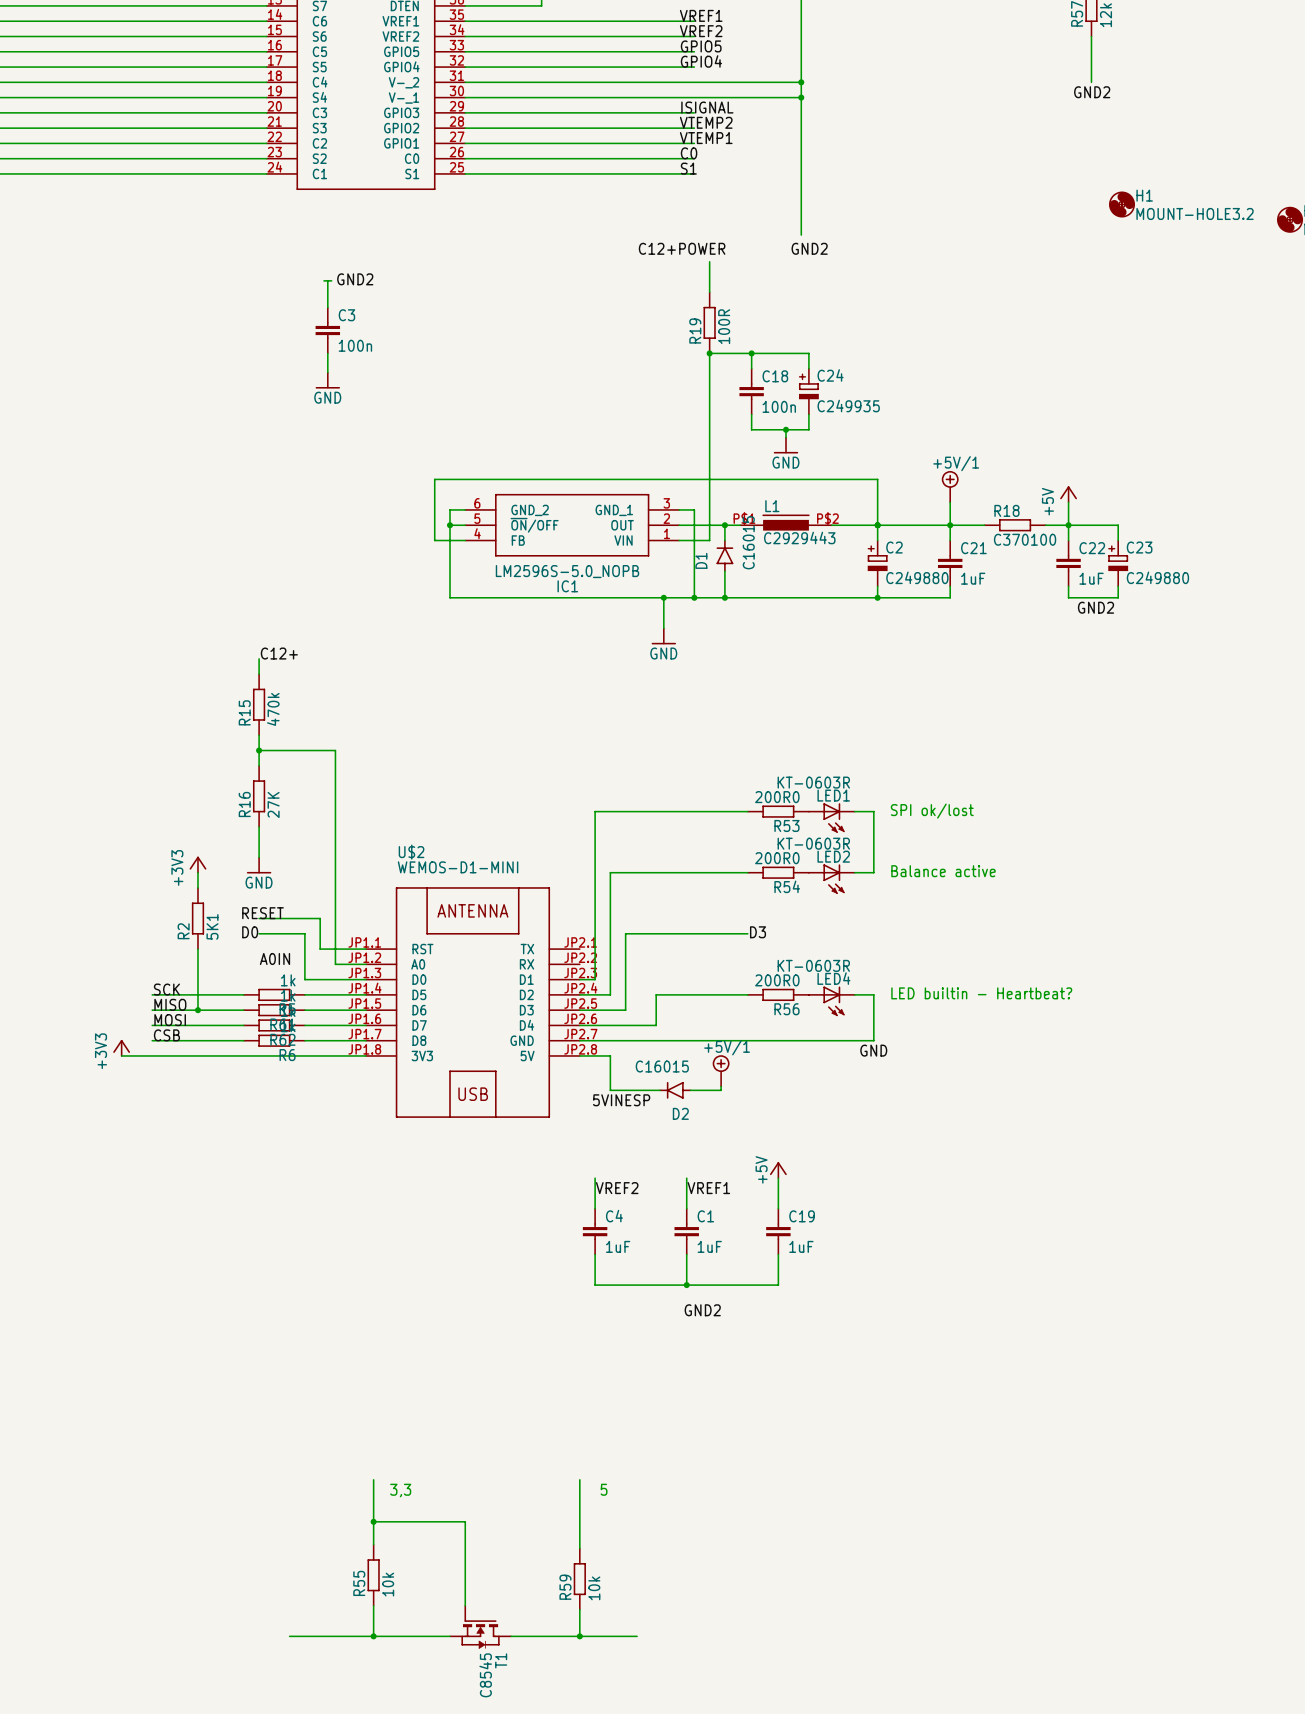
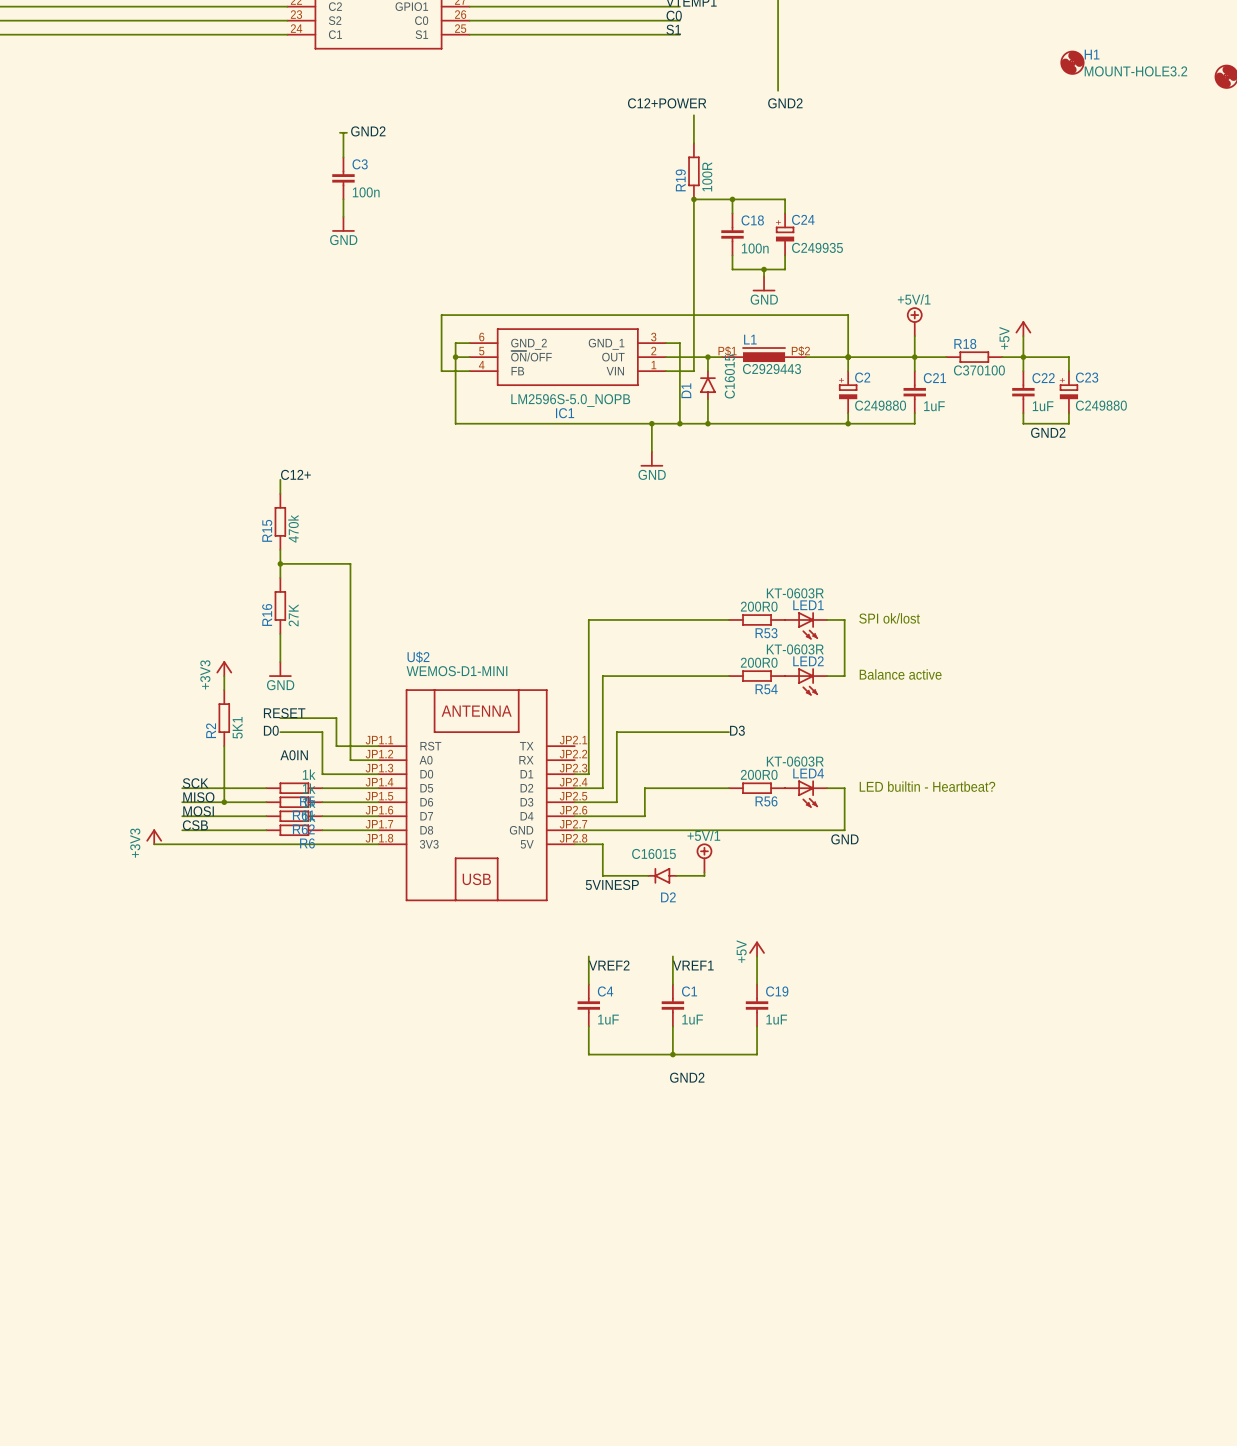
wire: (373, 1479) (373, 1544) -> none
wire: (579, 1479) (579, 1548) -> none
text: 5 (604, 1489) -> none
text: 3,3 (400, 1490) -> none
wire: (373, 1521) (465, 1521) (465, 1605) -> none
junction: (373, 1521) -> none
R55: 10k (373, 1575) -> none
R59: 10k (579, 1579) -> none
wire: (373, 1605) (373, 1636) -> none
wire: (579, 1609) (579, 1636) -> none
T1: C8545 (480, 1627) -> none
wire: (289, 1636) (450, 1636) -> none
junction: (373, 1636) -> none
wire: (511, 1636) (637, 1636) -> none
junction: (579, 1636) -> none

